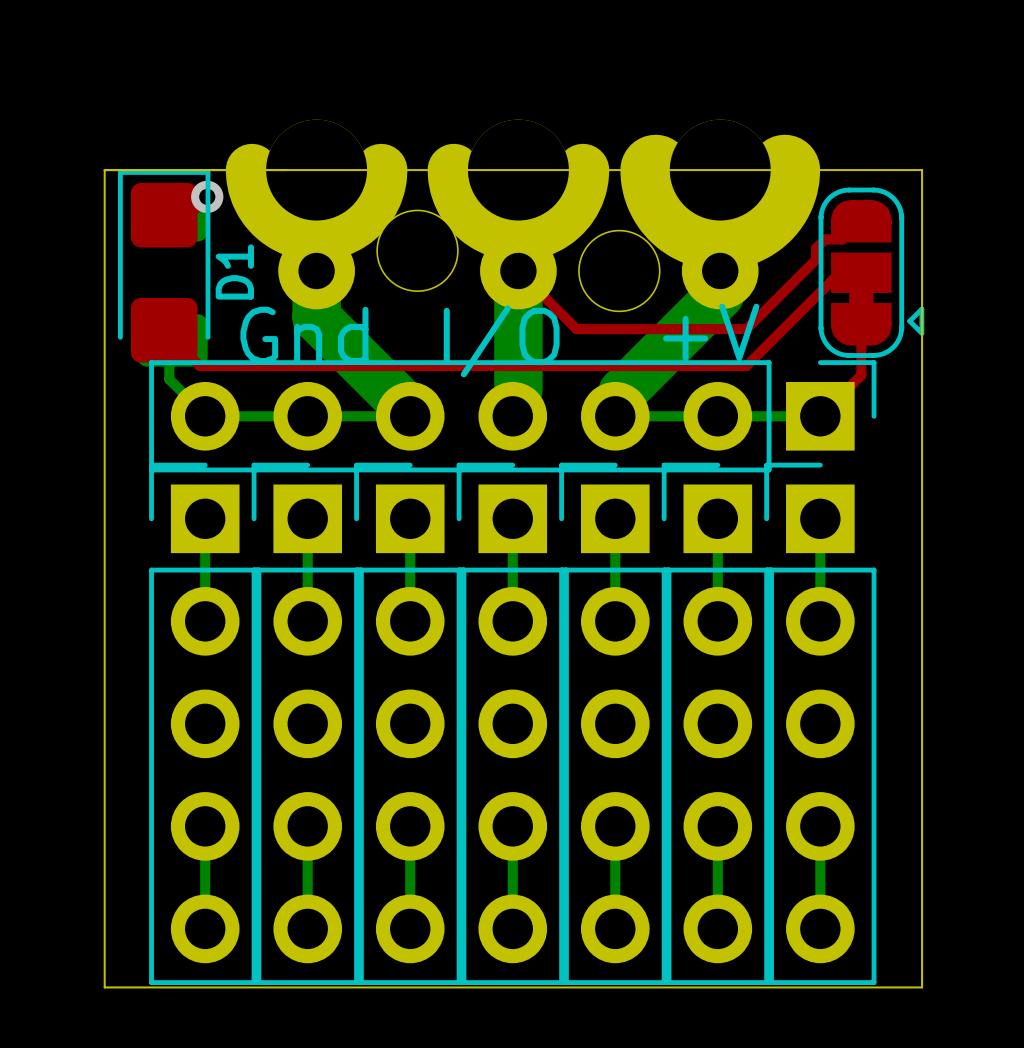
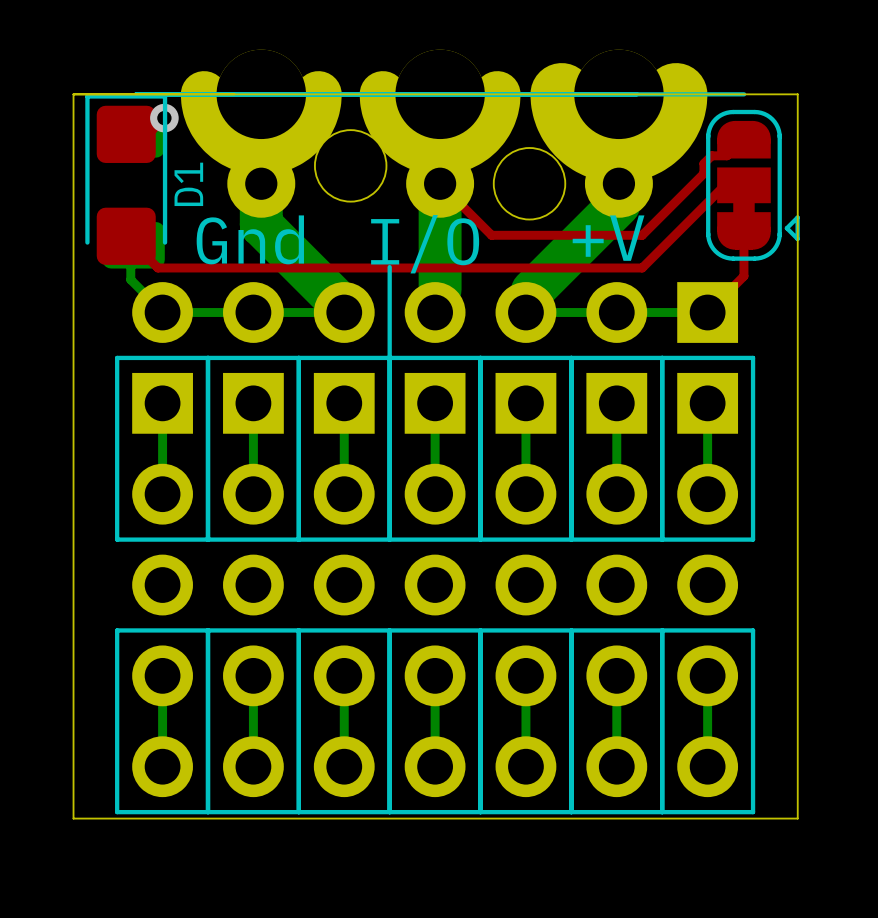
part footprint: [225, 119, 821, 312] -> [133, 49, 747, 220]
part footprint: [149, 360, 877, 473] -> [132, 282, 739, 343]
line: none -> (389, 267) (389, 357)
part footprint: [149, 462, 262, 986] -> [115, 355, 211, 815]
part footprint: [251, 462, 364, 986] -> [205, 355, 301, 815]
part footprint: [354, 462, 467, 986] -> [296, 355, 392, 815]
part footprint: [456, 462, 569, 986] -> [387, 355, 483, 815]
part footprint: [559, 462, 672, 986] -> [478, 355, 574, 815]
part footprint: [661, 462, 774, 986] -> [569, 355, 665, 815]
part footprint: [764, 462, 877, 986] -> [660, 355, 756, 815]

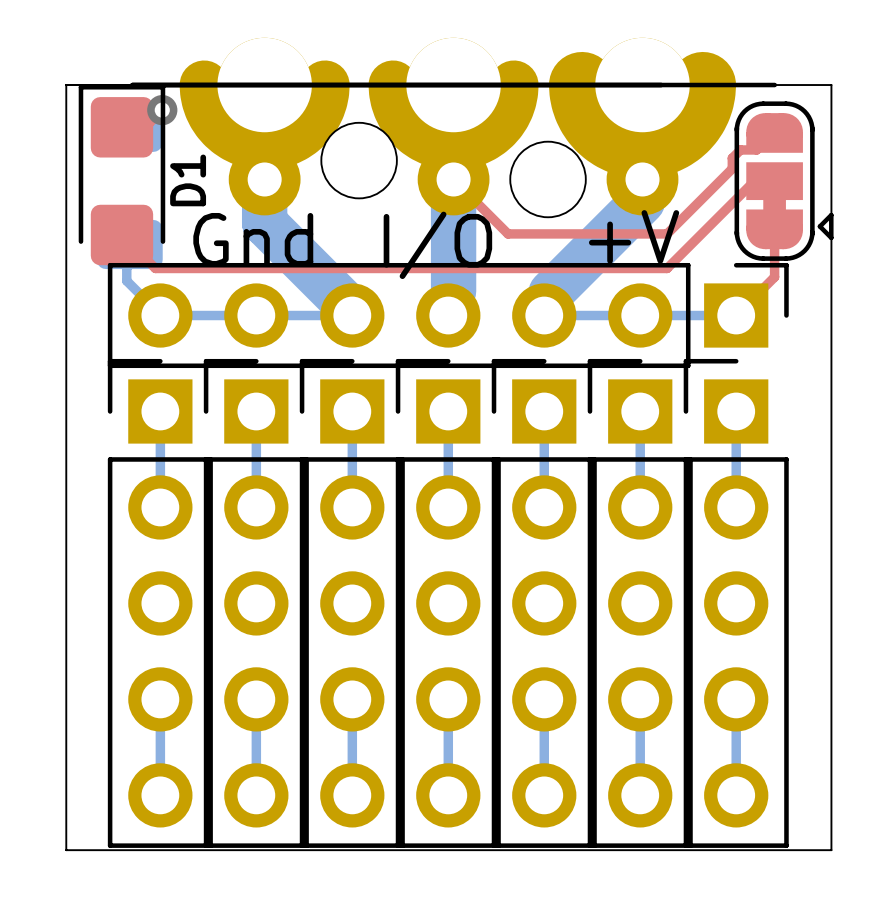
line: (389, 267) (389, 357) -> none
part footprint: [132, 282, 739, 343] -> [107, 262, 789, 369]
part footprint: [115, 355, 211, 815] -> [107, 358, 213, 848]
part footprint: [205, 355, 301, 815] -> [203, 358, 309, 848]
part footprint: [296, 355, 392, 815] -> [299, 358, 405, 848]
part footprint: [387, 355, 483, 815] -> [395, 358, 501, 848]
part footprint: [478, 355, 574, 815] -> [491, 358, 597, 848]
part footprint: [569, 355, 665, 815] -> [587, 358, 693, 848]
part footprint: [660, 355, 756, 815] -> [683, 358, 789, 848]

